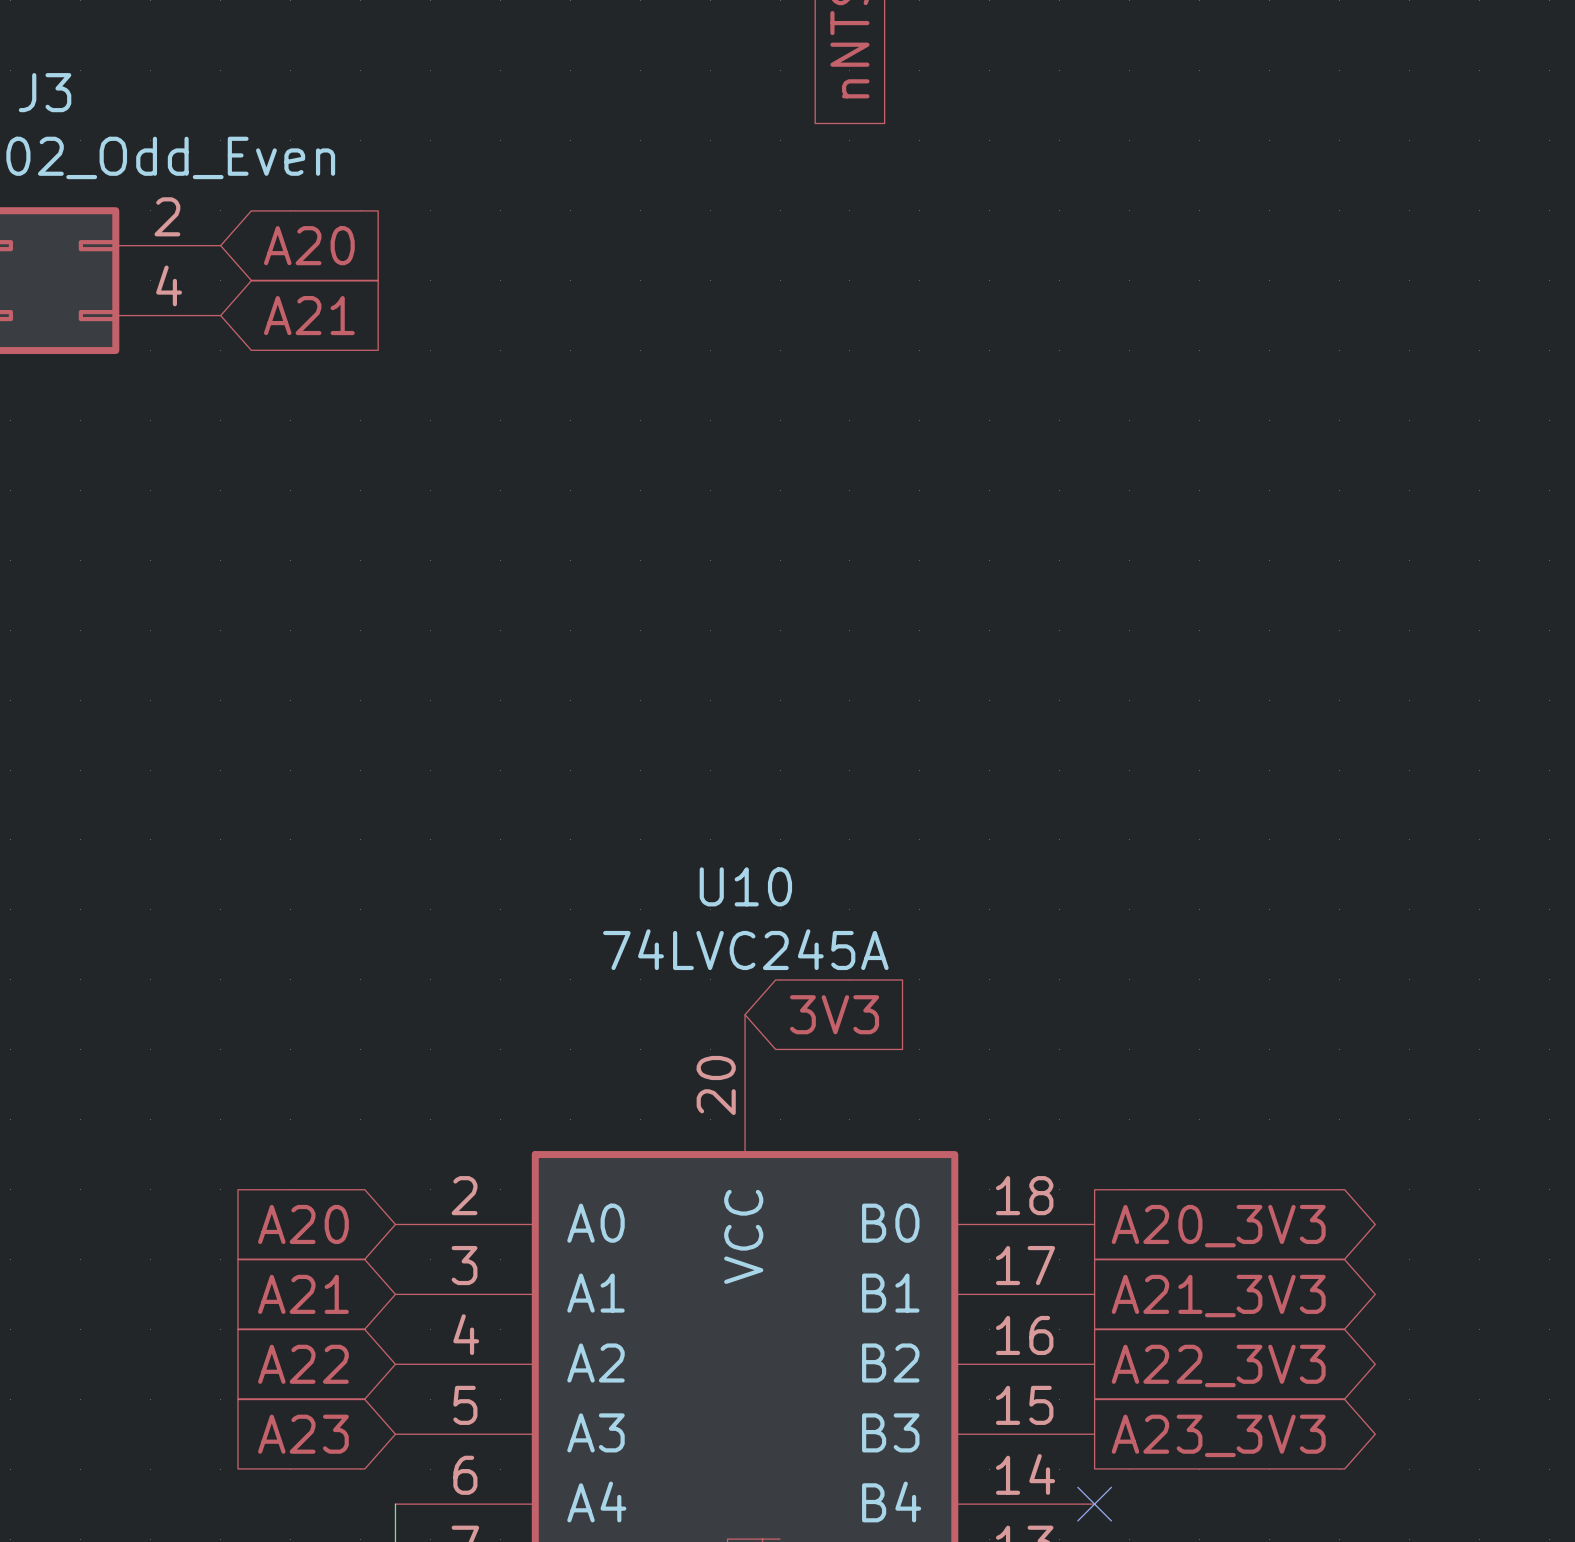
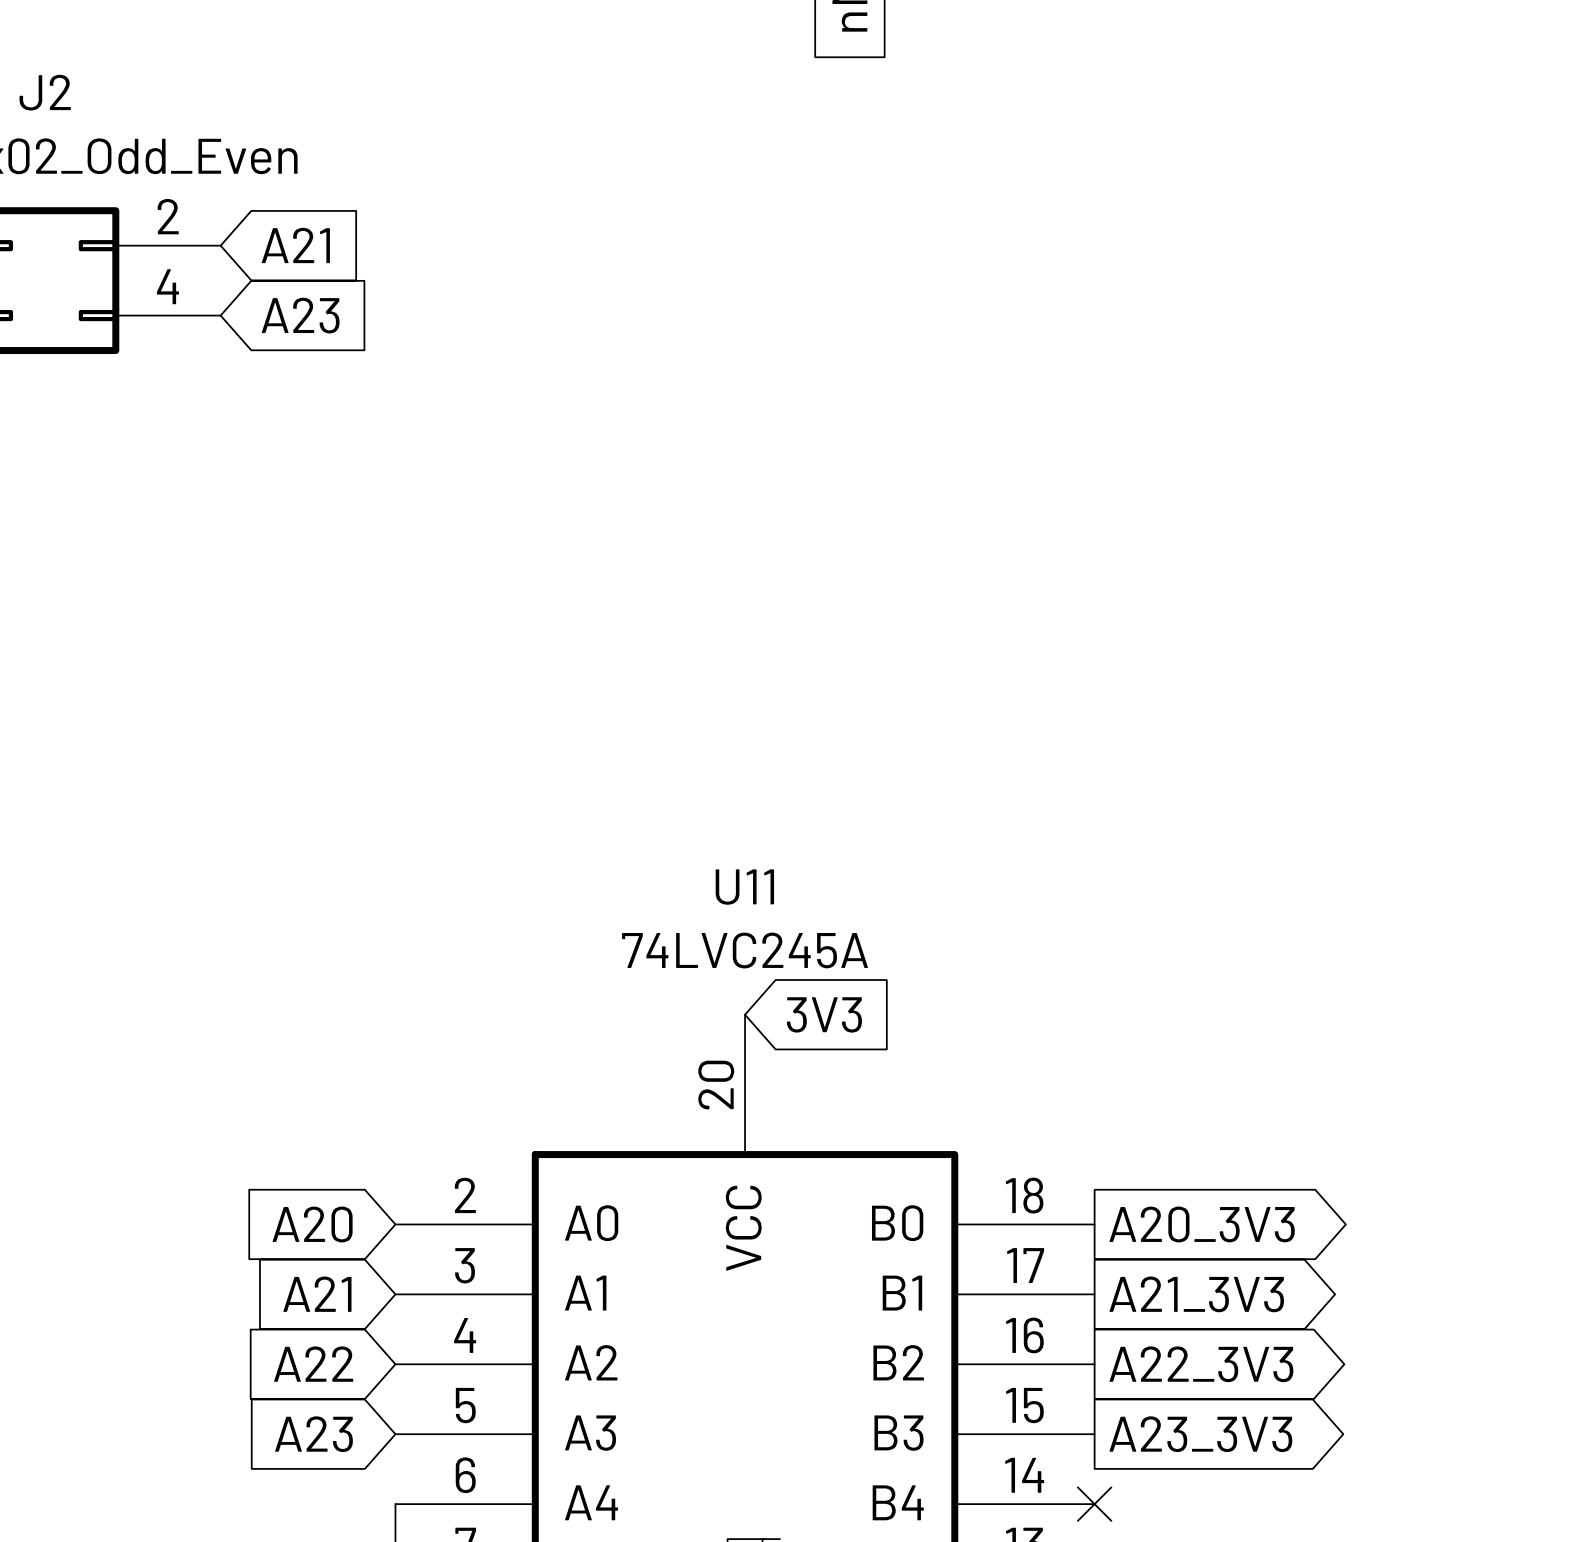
J3 name: J3 (45, 92) -> J2 (45, 92)
global label: A20 (309, 245) -> A21 (295, 245)
global label: A21 (309, 315) -> A23 (300, 315)
U10 name: U10 (745, 886) -> U11 (744, 887)

